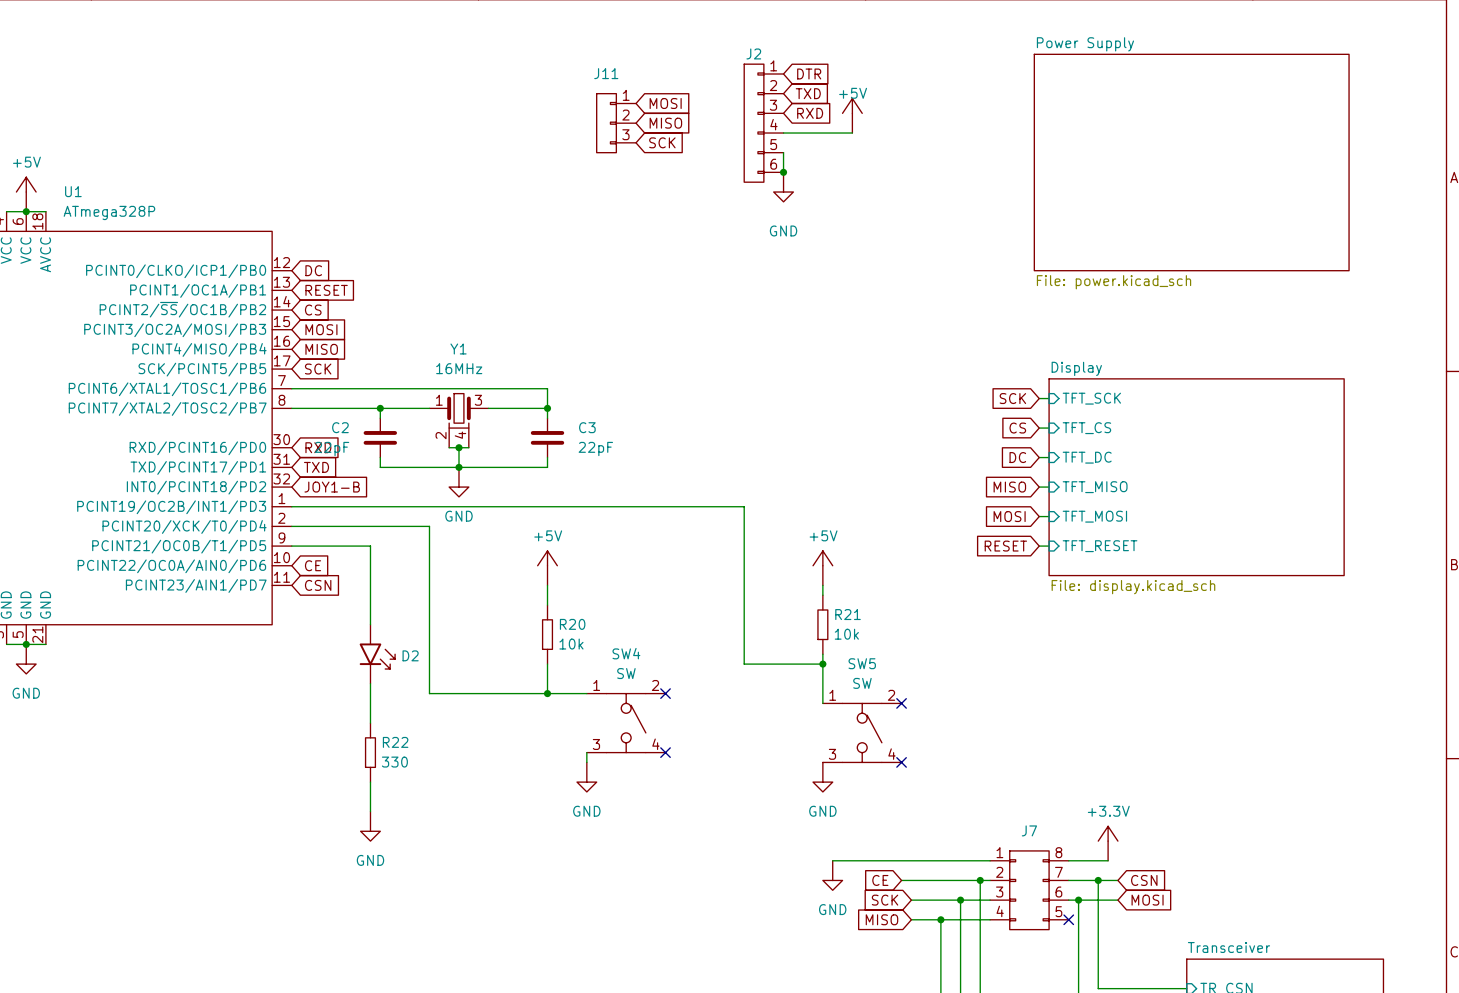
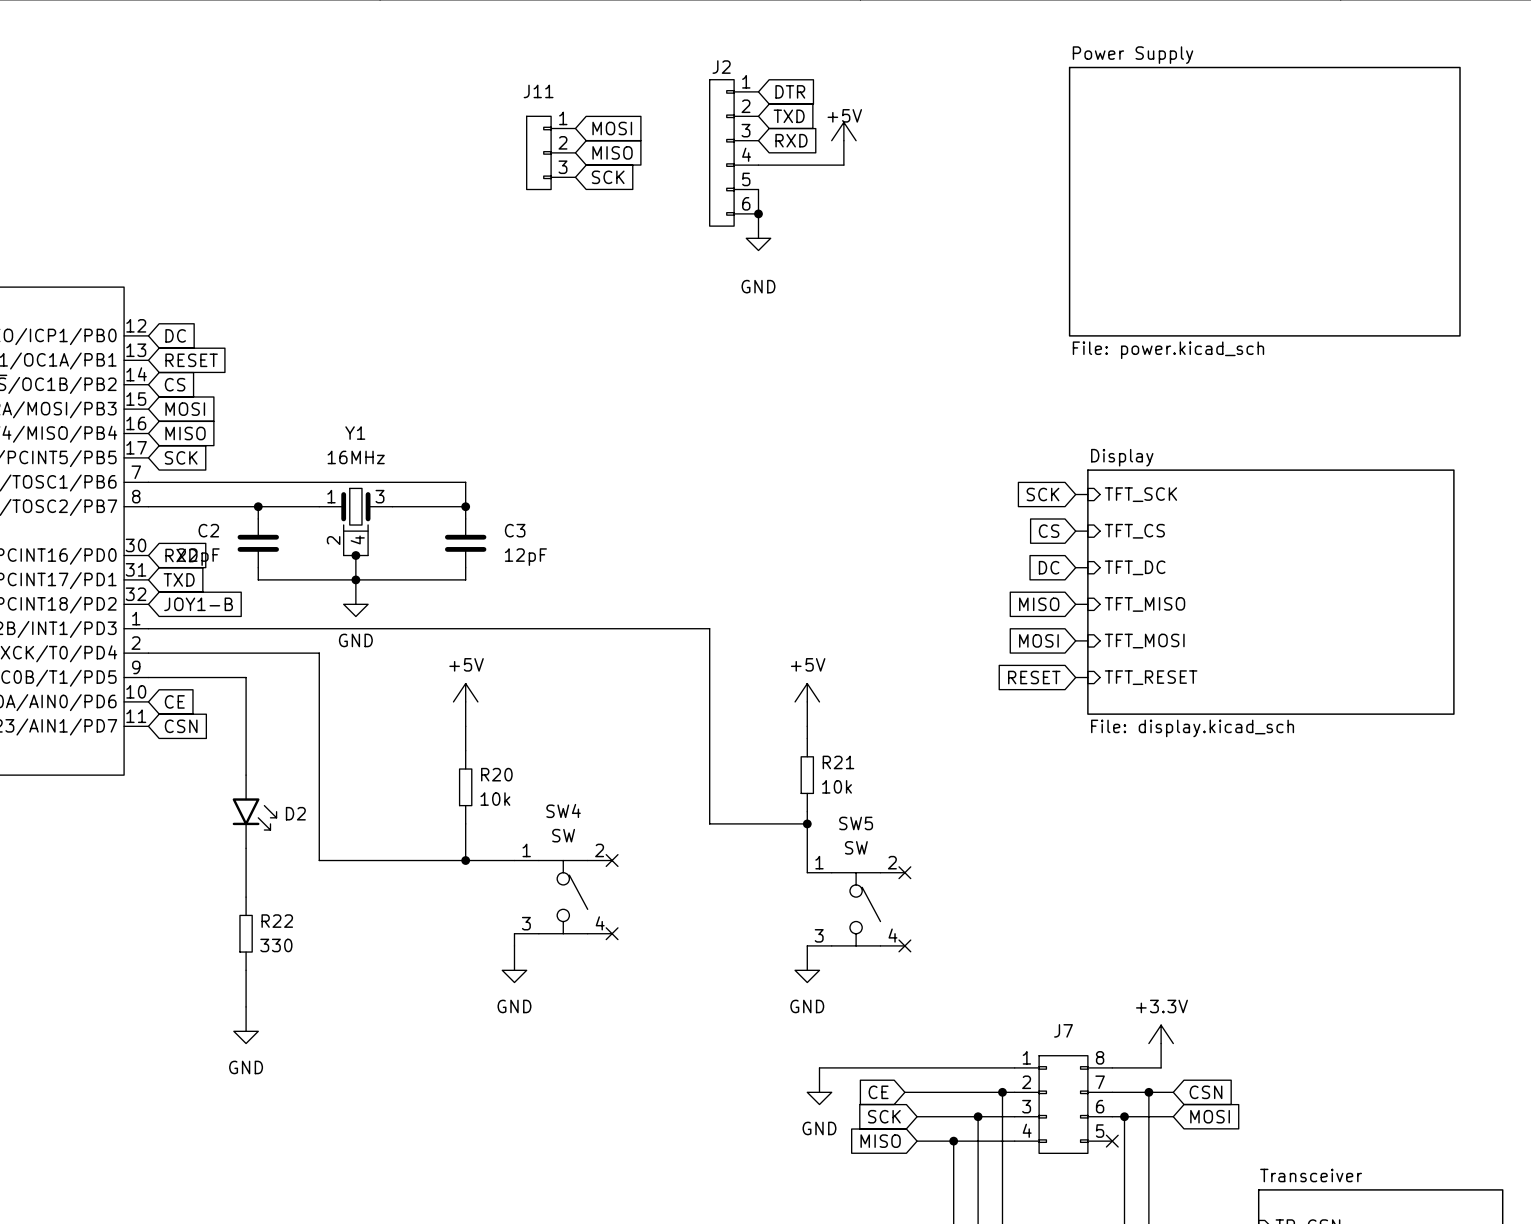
C3 value: 22pF (595, 448) -> 12pF (525, 557)

